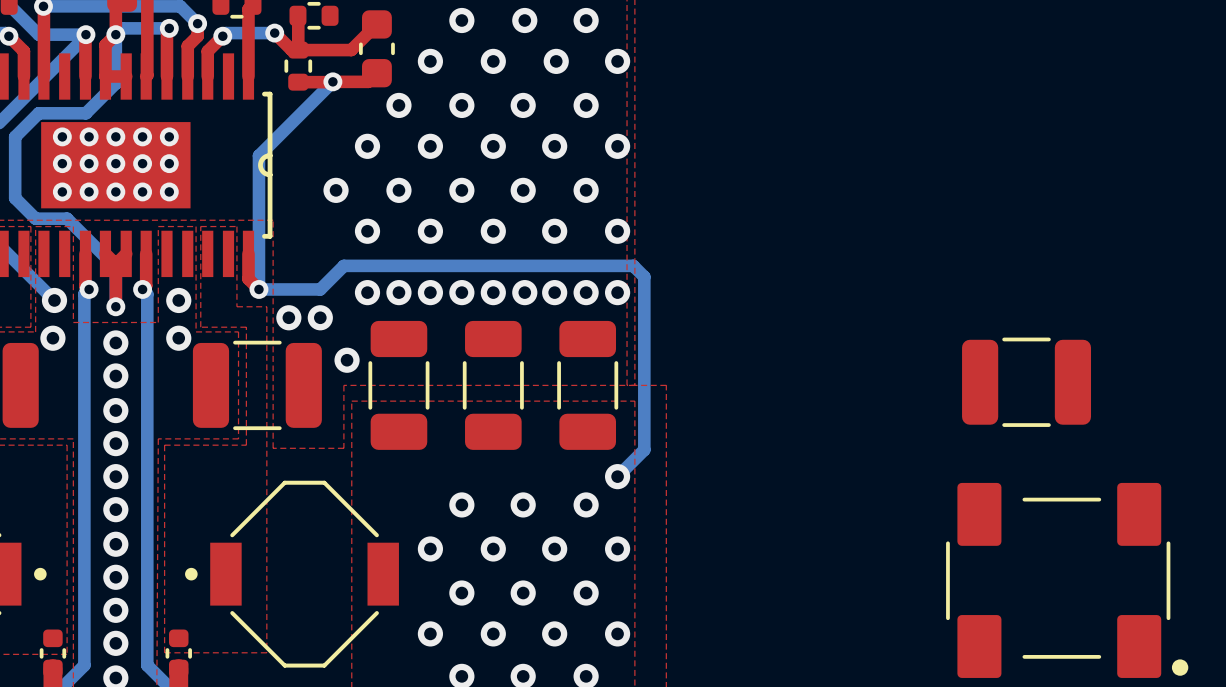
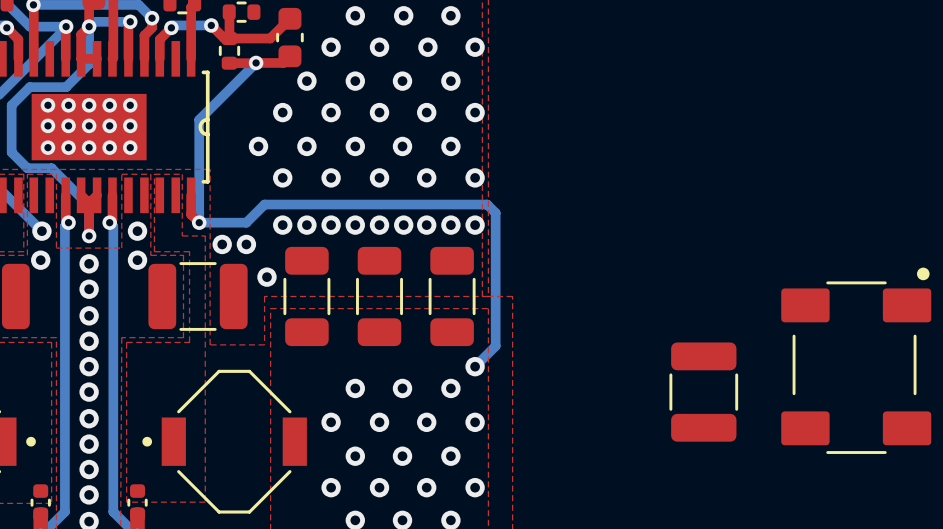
part rotation: 0° (1026, 382) -> 90° clockwise (703, 392)
part position: (1026, 382) -> (703, 392)
part rotation: 0° (1067, 580) -> 90° counterclockwise (856, 360)

